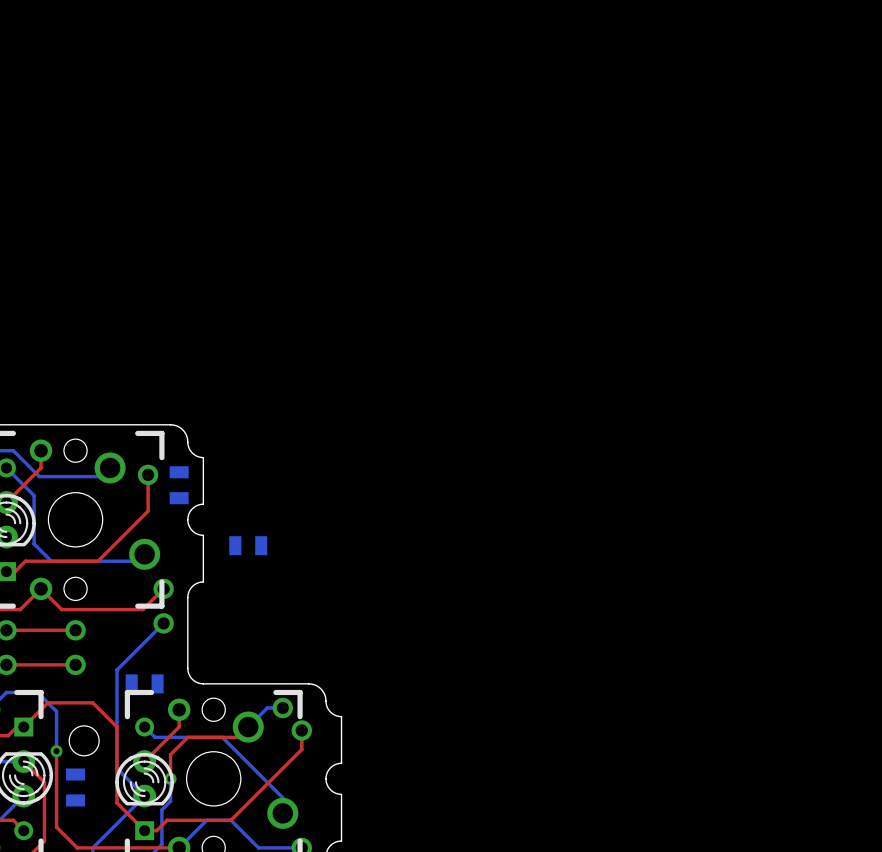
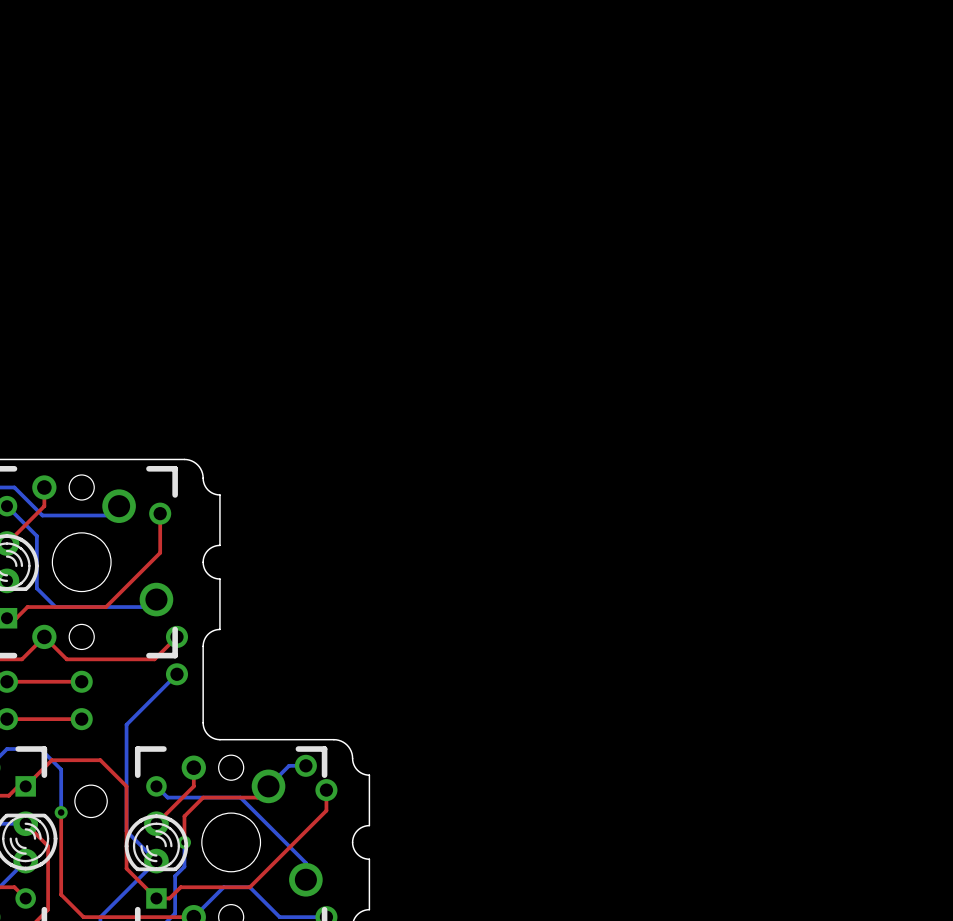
part: (179, 485) -> none
part: (248, 545) -> none
part: (144, 683) -> none
part: (75, 787) -> none

